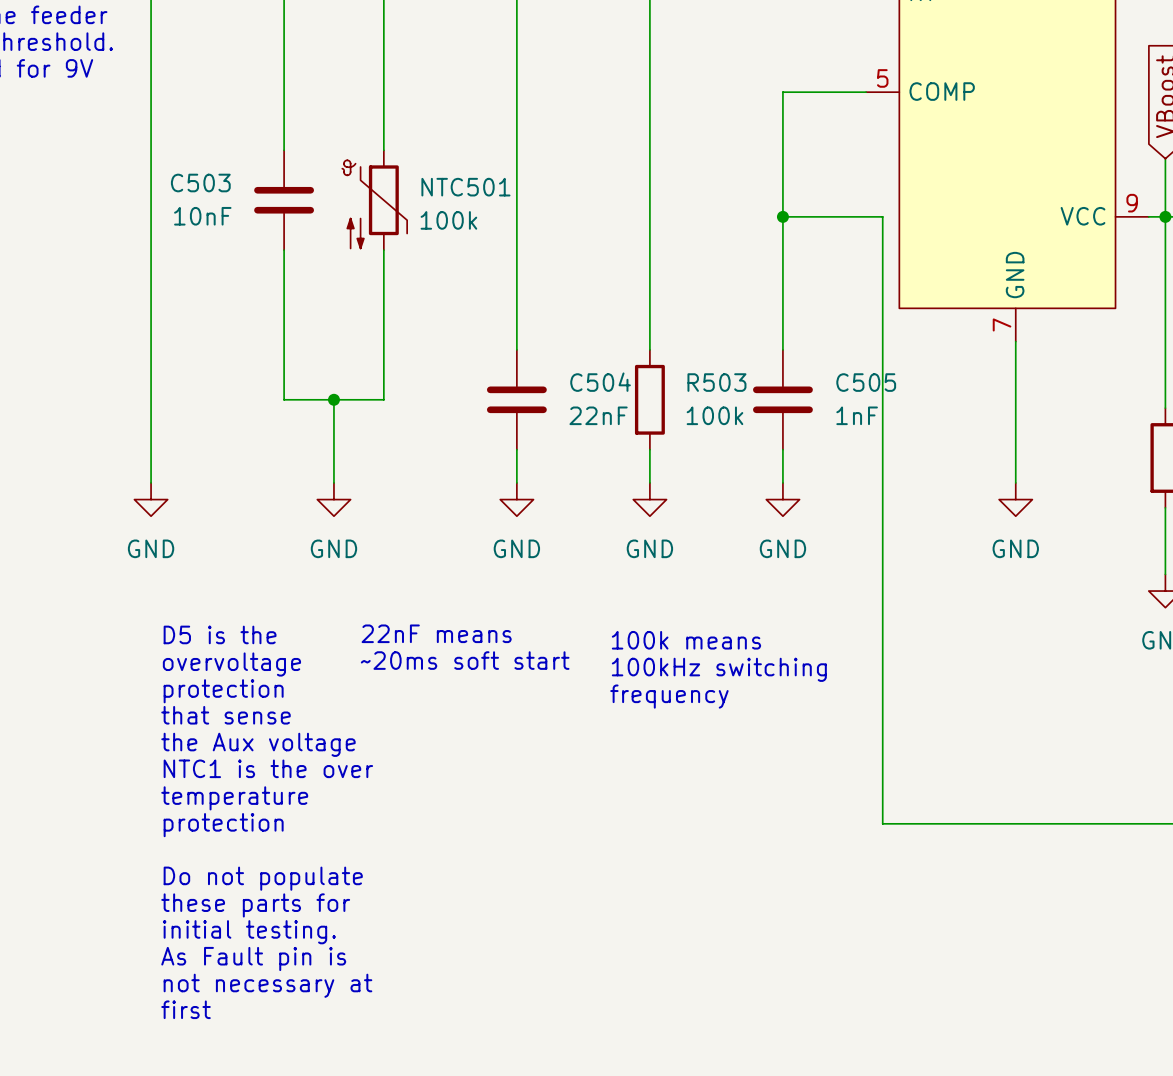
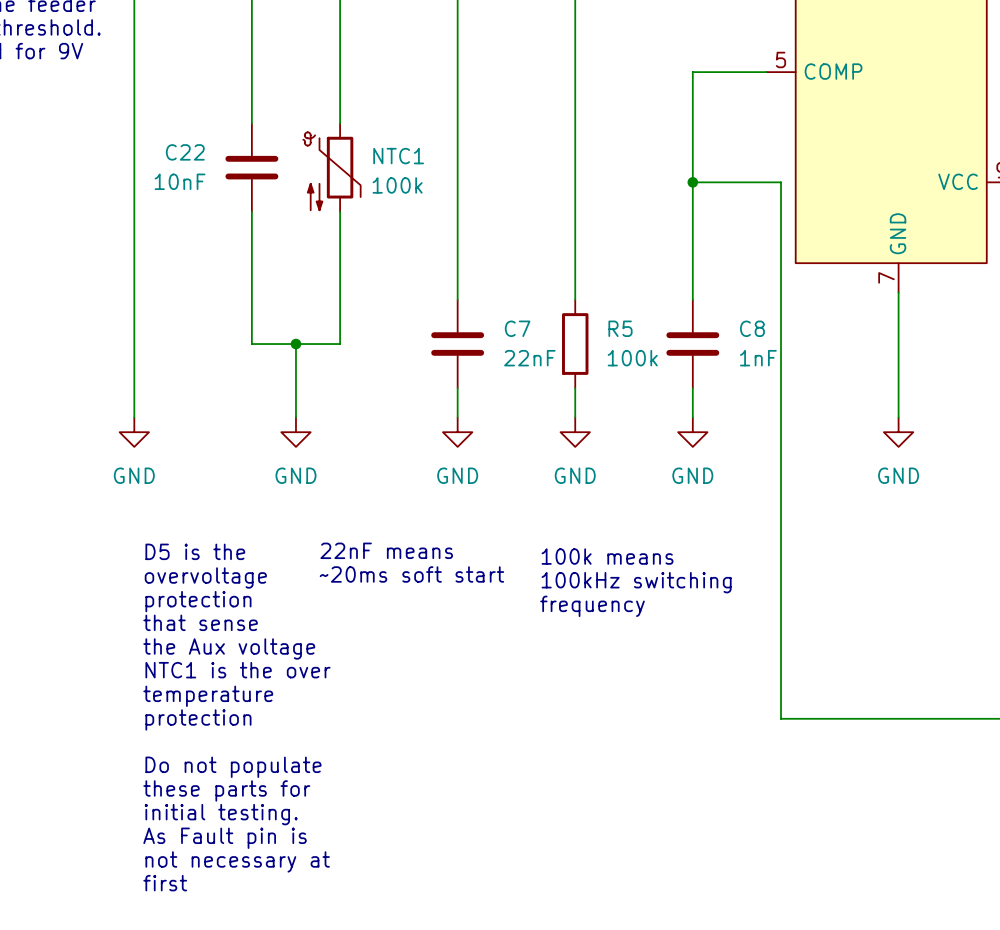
C503 name: C503 (200, 183) -> C22 (185, 152)
NTC501 name: NTC501 (465, 187) -> NTC1 (398, 156)
C504 name: C504 (600, 382) -> C7 (517, 328)
R503 name: R503 (716, 382) -> R5 (620, 328)
C505 name: C505 (866, 382) -> C8 (752, 328)

